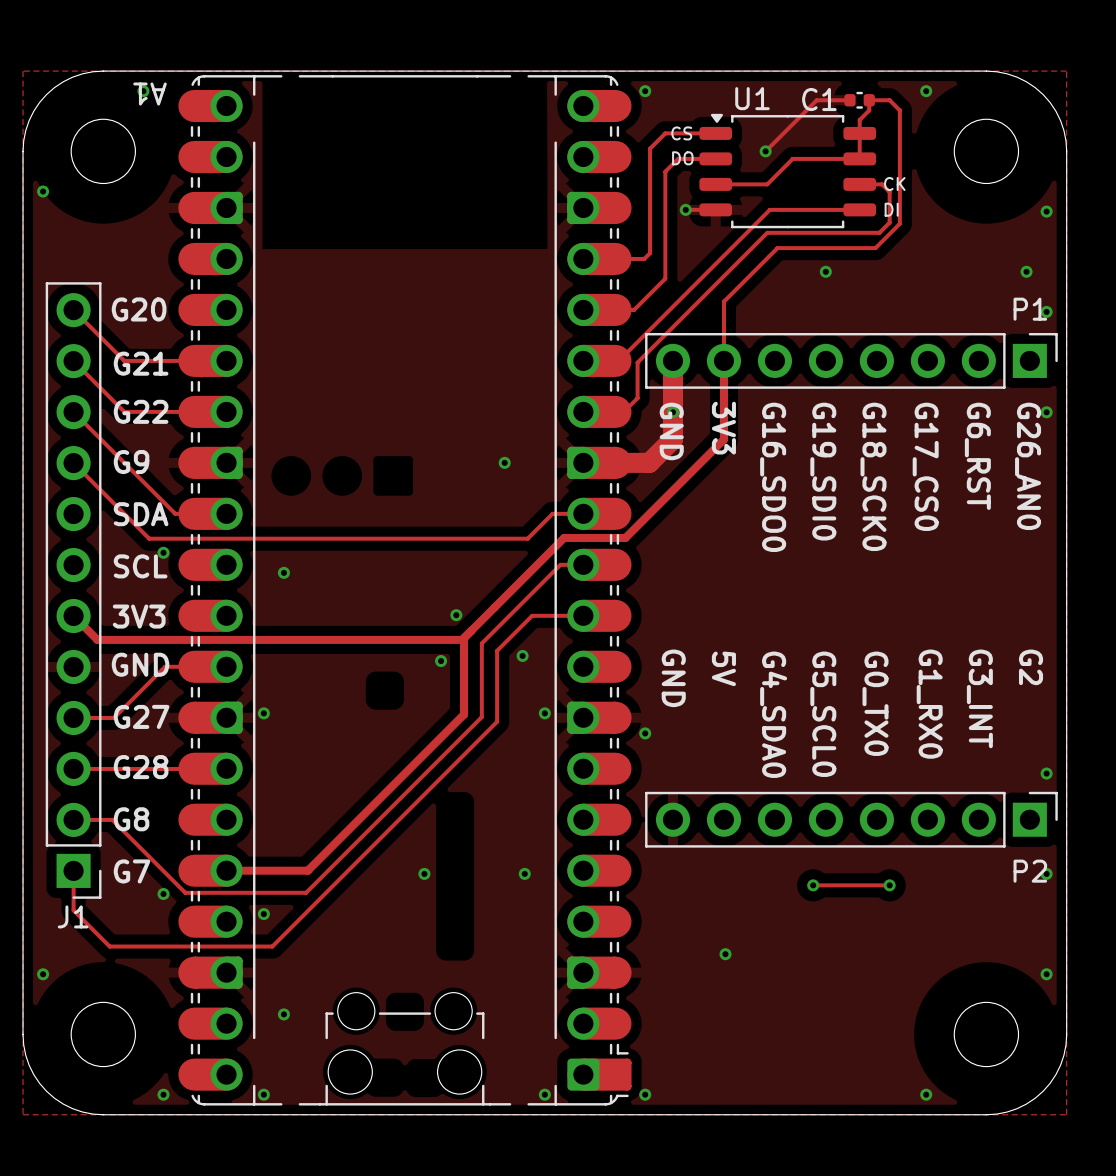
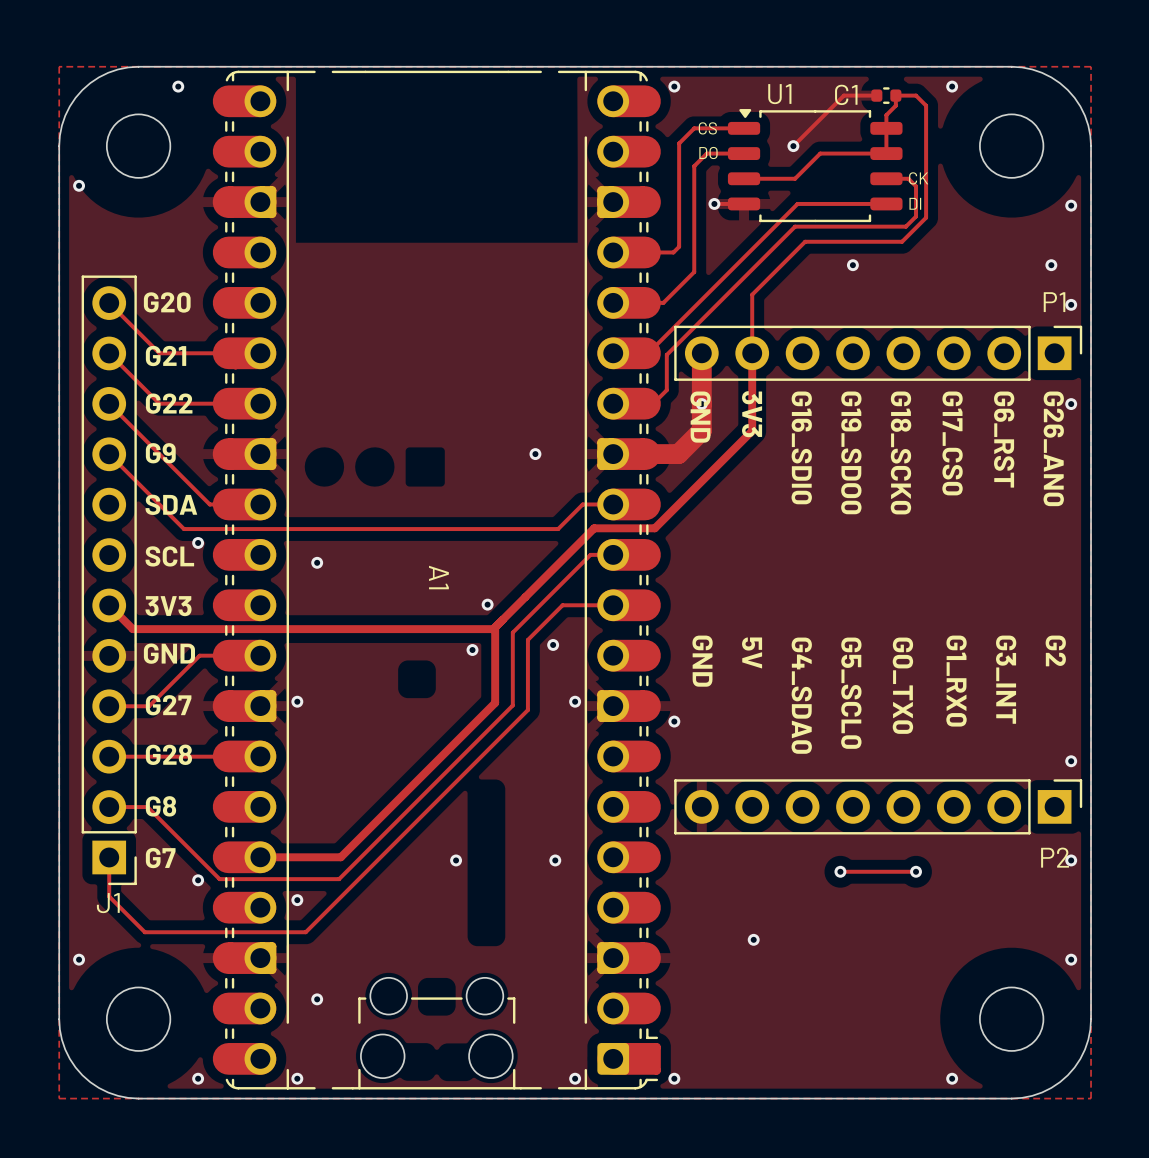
A1 name rotation: 0° (149, 94) -> 90° counterclockwise (438, 577)
A1 name position: A1 (149, 94) -> A1 (438, 577)
text: G19_SDI0 (823, 471) -> G19_SDO0 (851, 452)
text: G16_SDO0 (773, 477) -> G16_SDI0 (801, 447)

